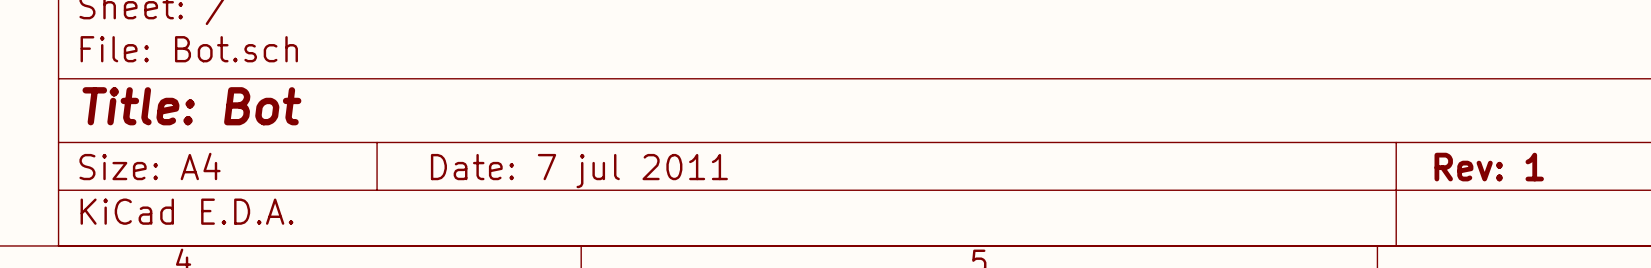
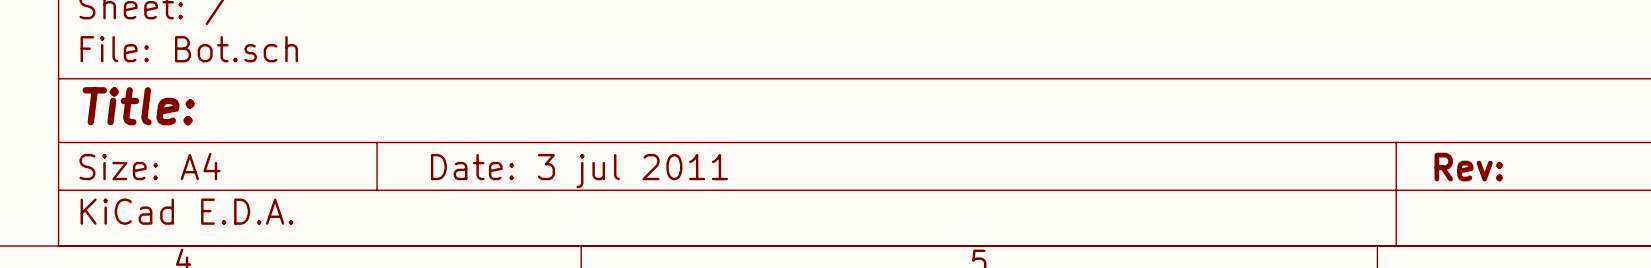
title block: Title: Bot (191, 106) -> Title: (138, 106)
title block: Rev: 1 (1489, 167) -> Rev: (1468, 167)
title block: Date: 7 jul 2011 (579, 171) -> Date: 3 jul 2011 (579, 171)

